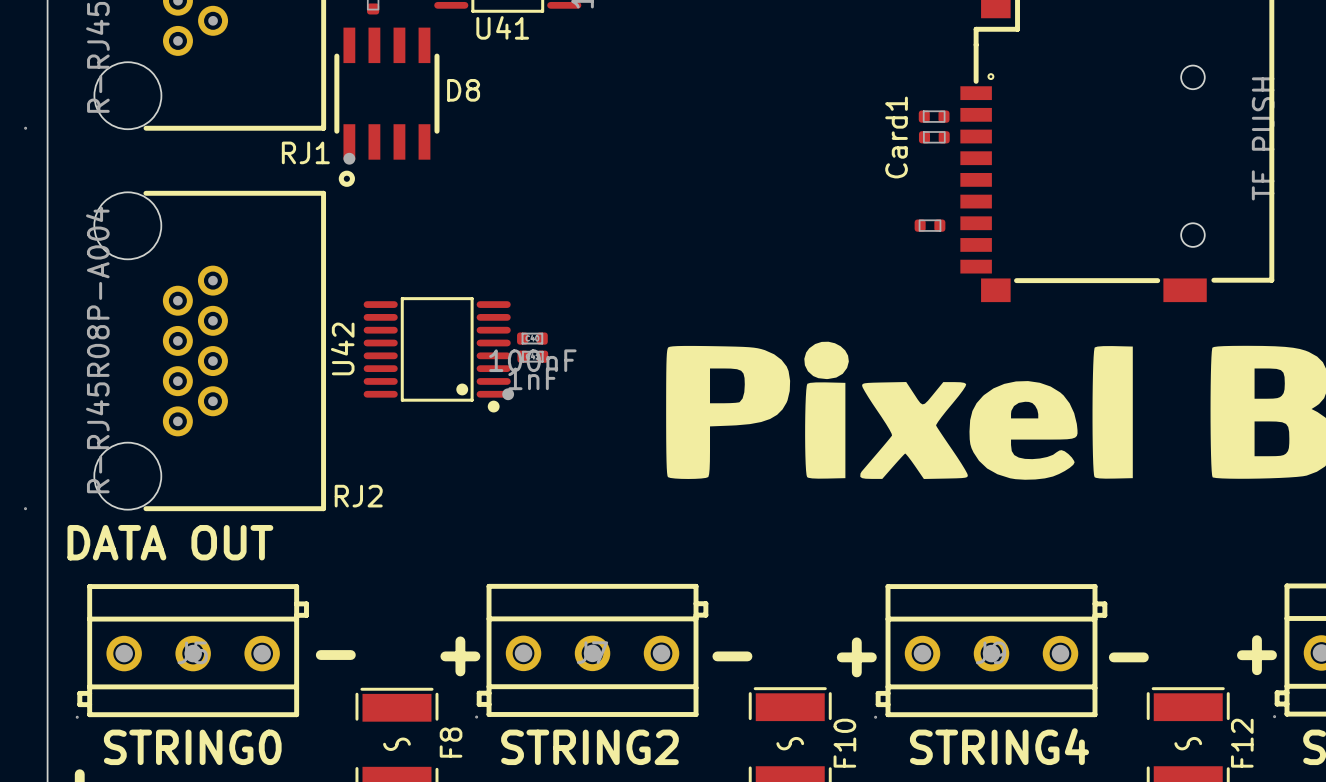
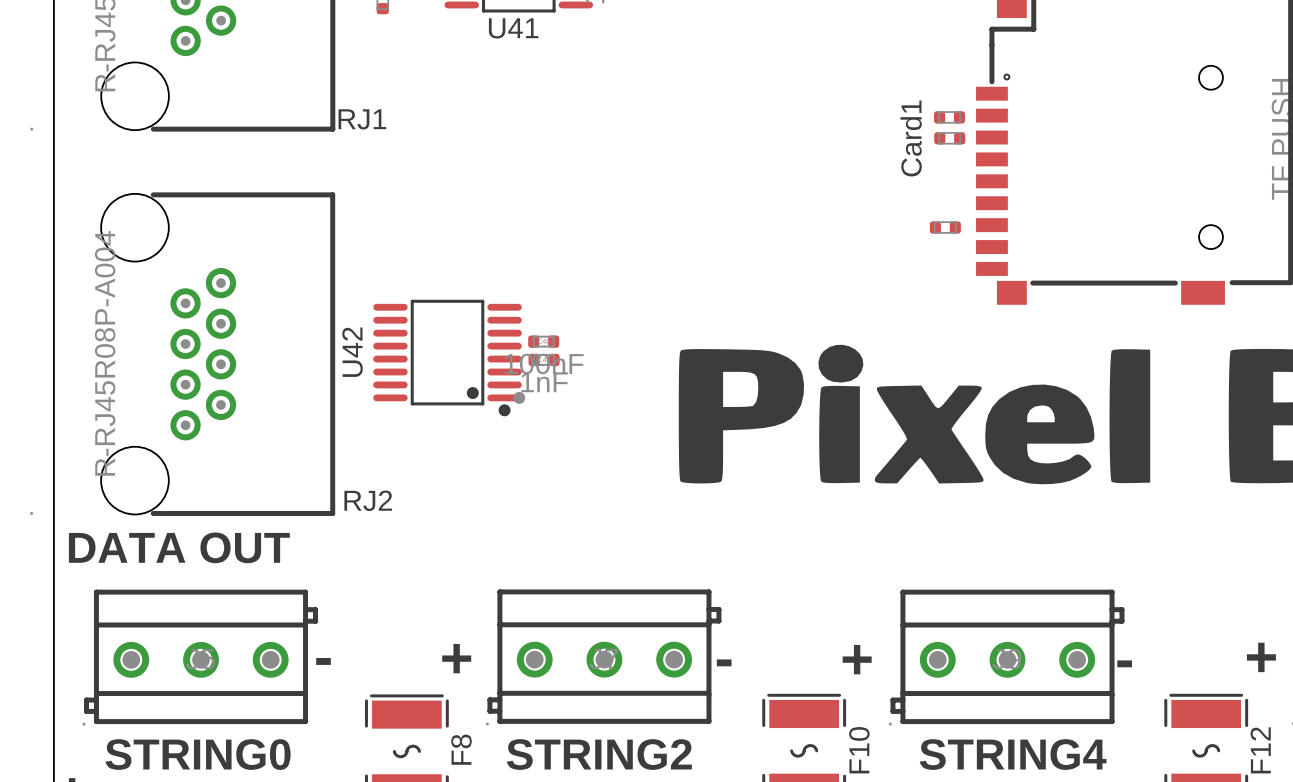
D8: (386, 107) -> none
RJ1 name position: RJ1 (305, 152) -> RJ1 (362, 119)

